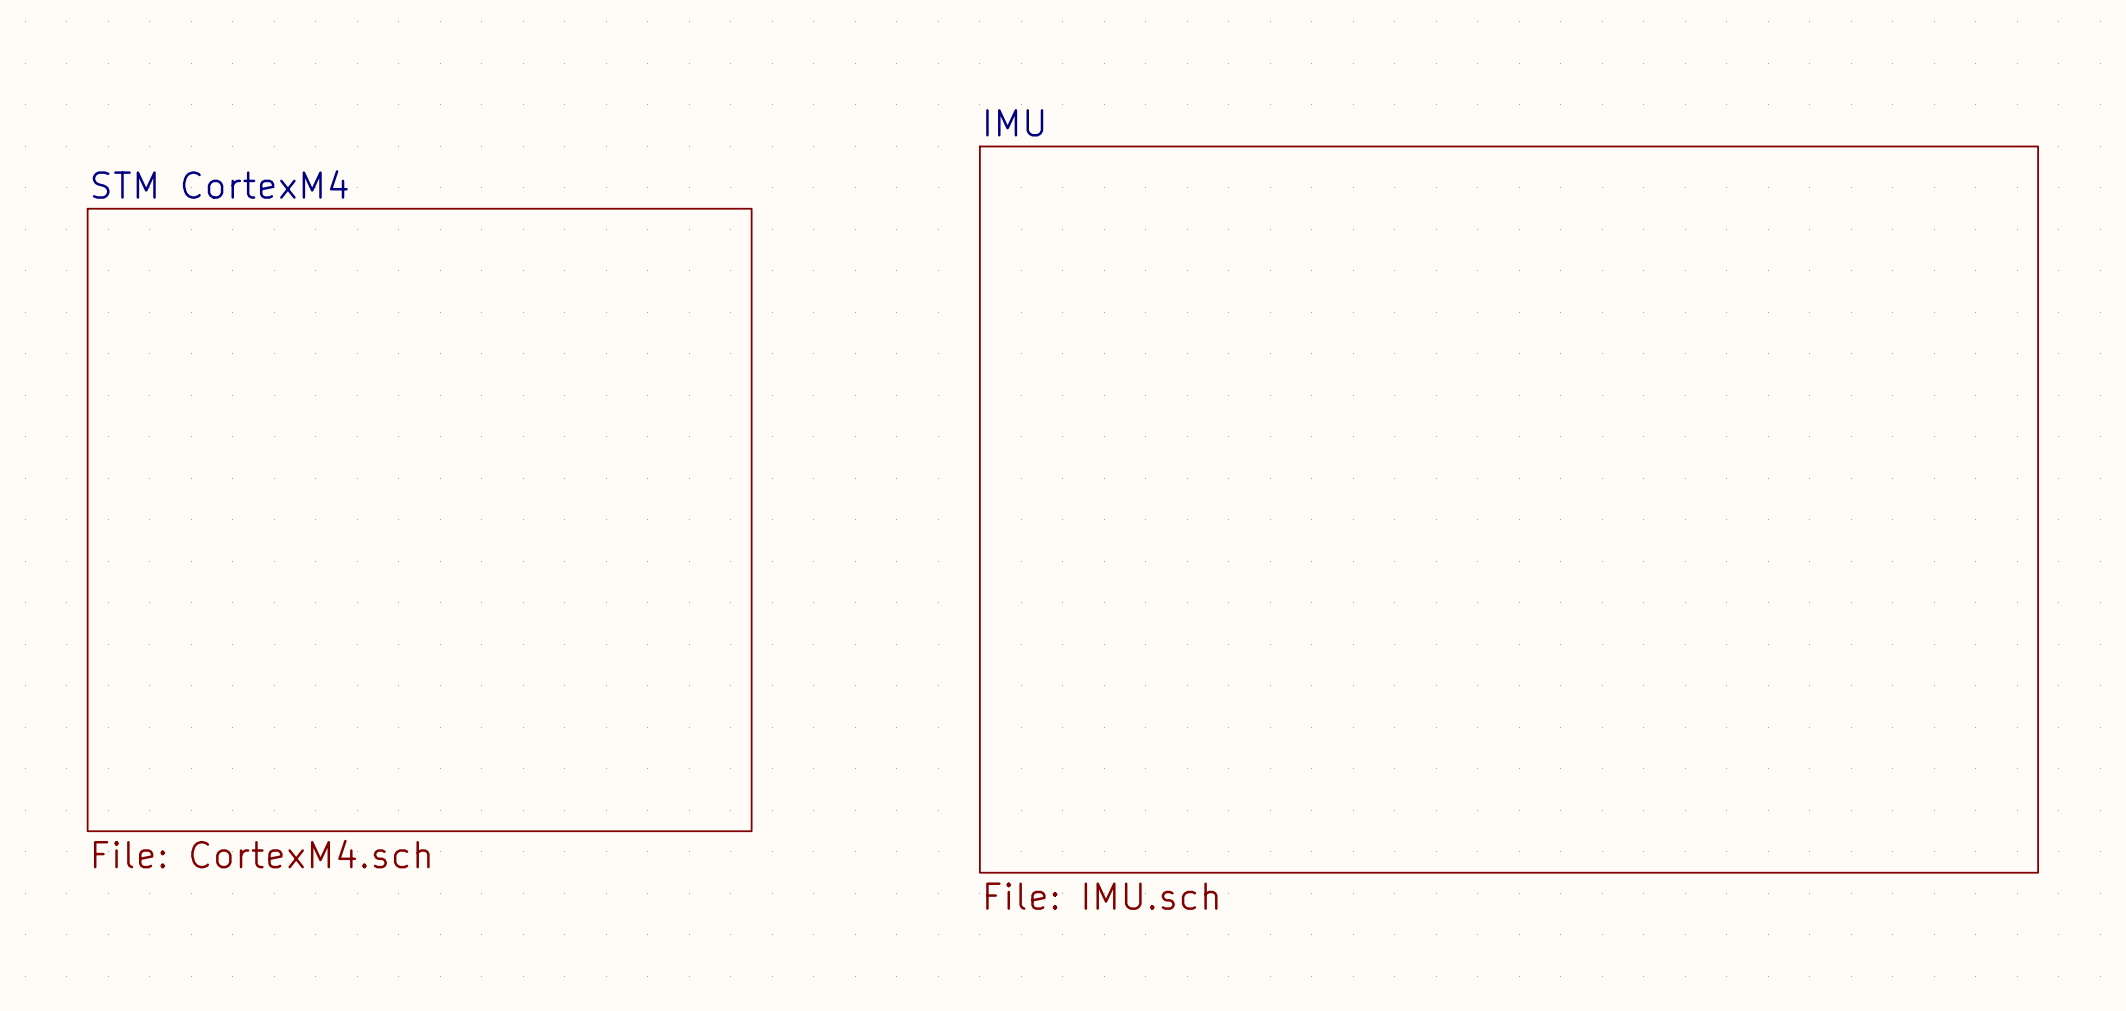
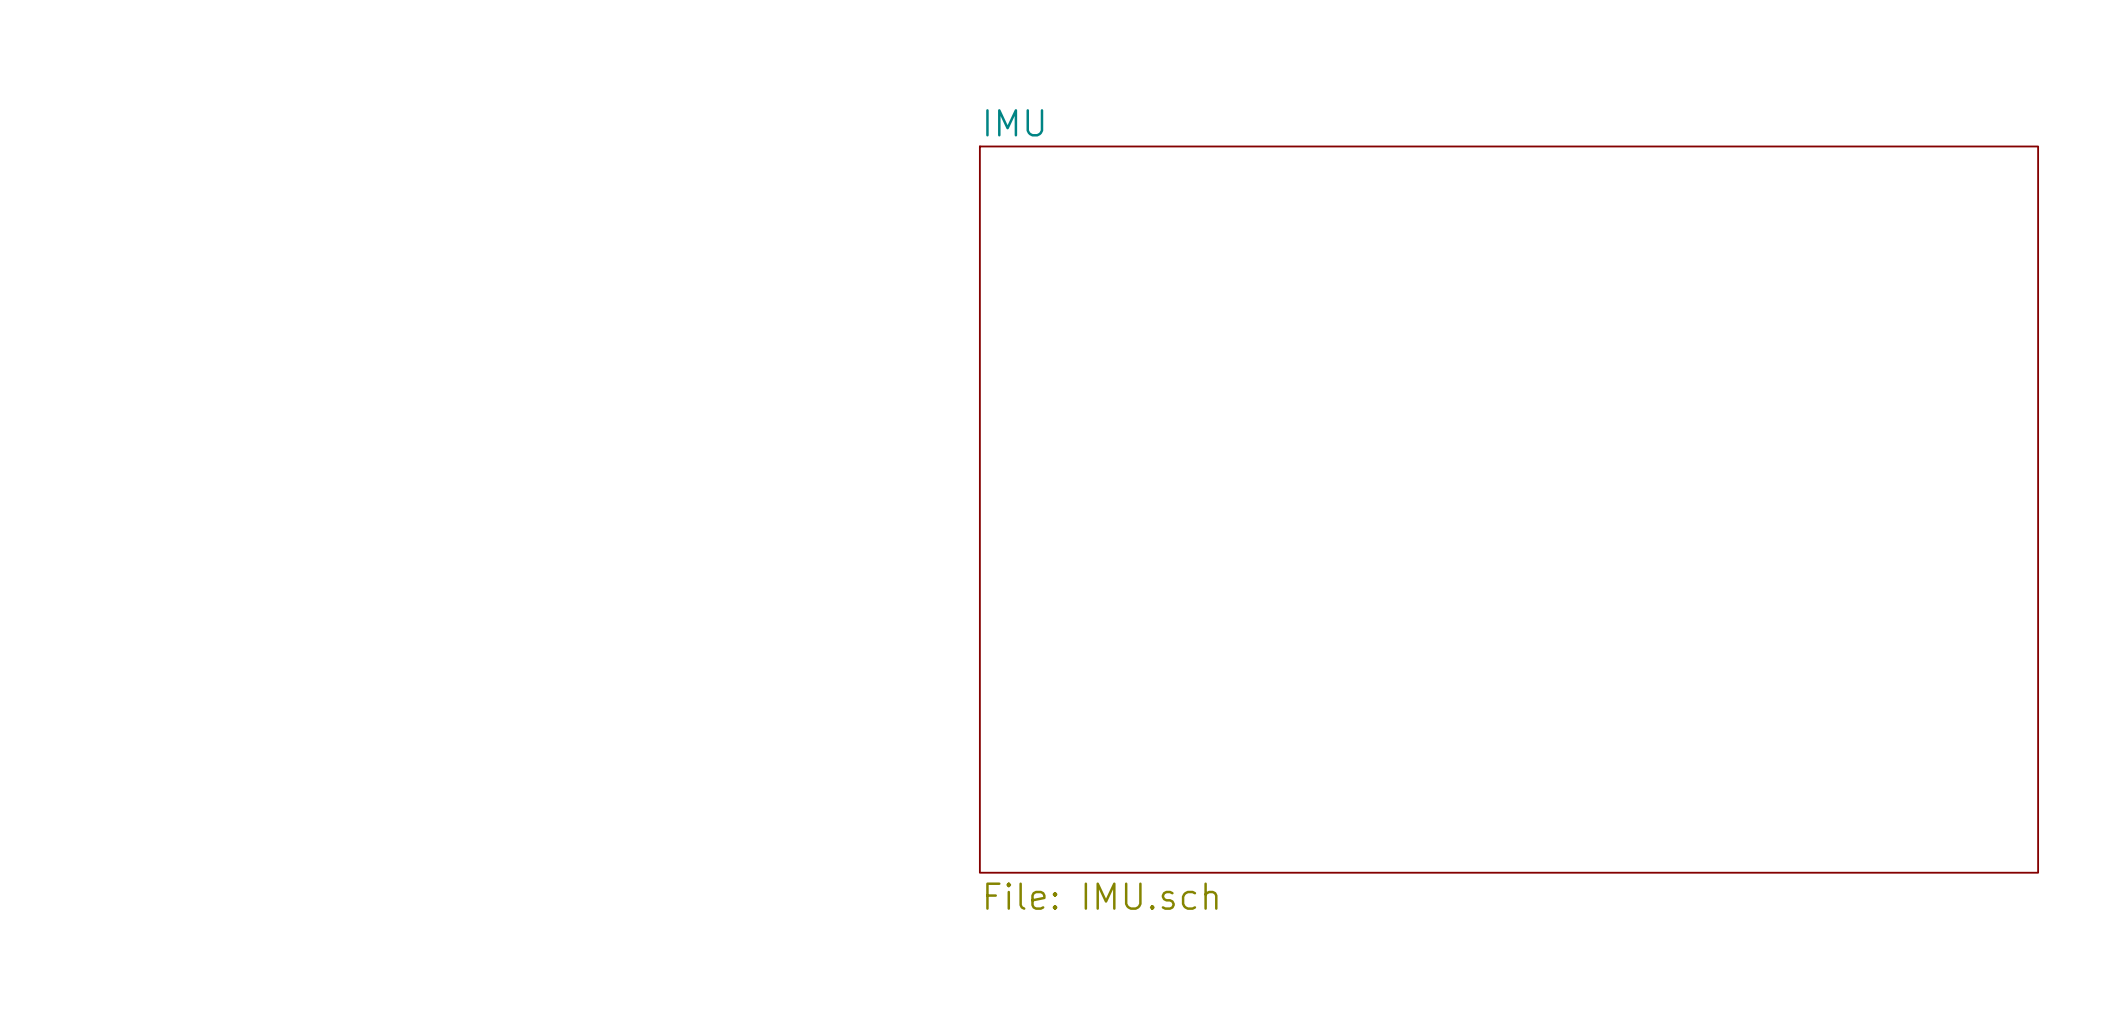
sheet STM CortexM4: File: CortexM4.sch (419, 519) -> none

